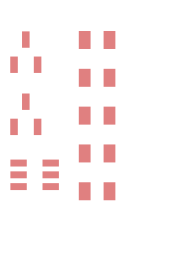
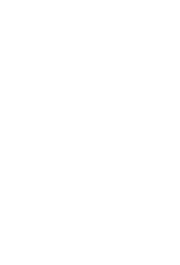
part: (97, 39) -> none
part: (25, 52) -> none
part: (97, 77) -> none
part: (25, 114) -> none
part: (97, 115) -> none
part: (97, 153) -> none
part: (34, 174) -> none
part: (97, 191) -> none

